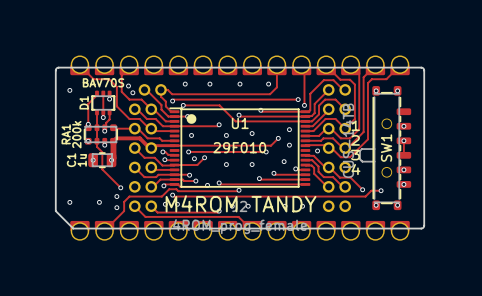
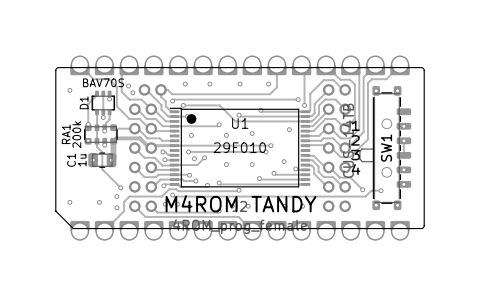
track: (278, 138) (271, 145) -> none
via: (278, 138) -> none
via: none -> (271, 145)
via: (289, 145) -> none
via: (317, 150) -> none

